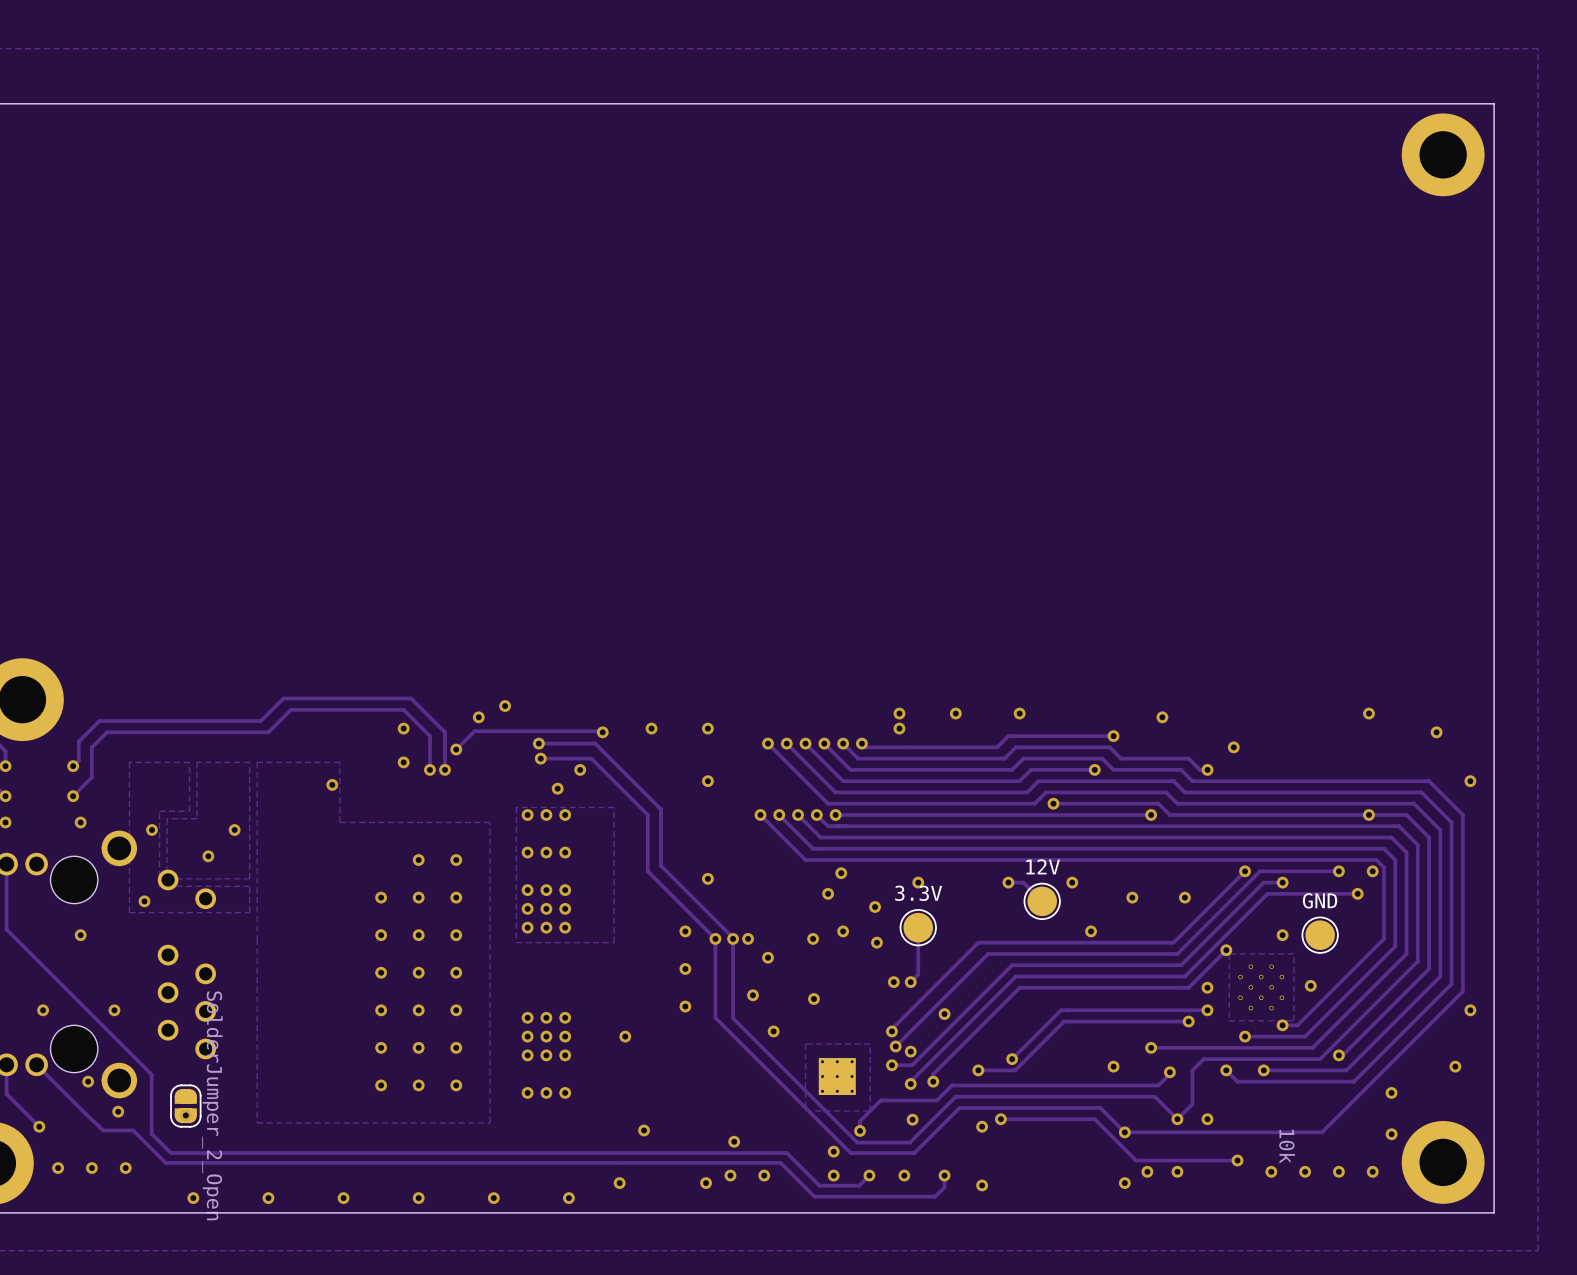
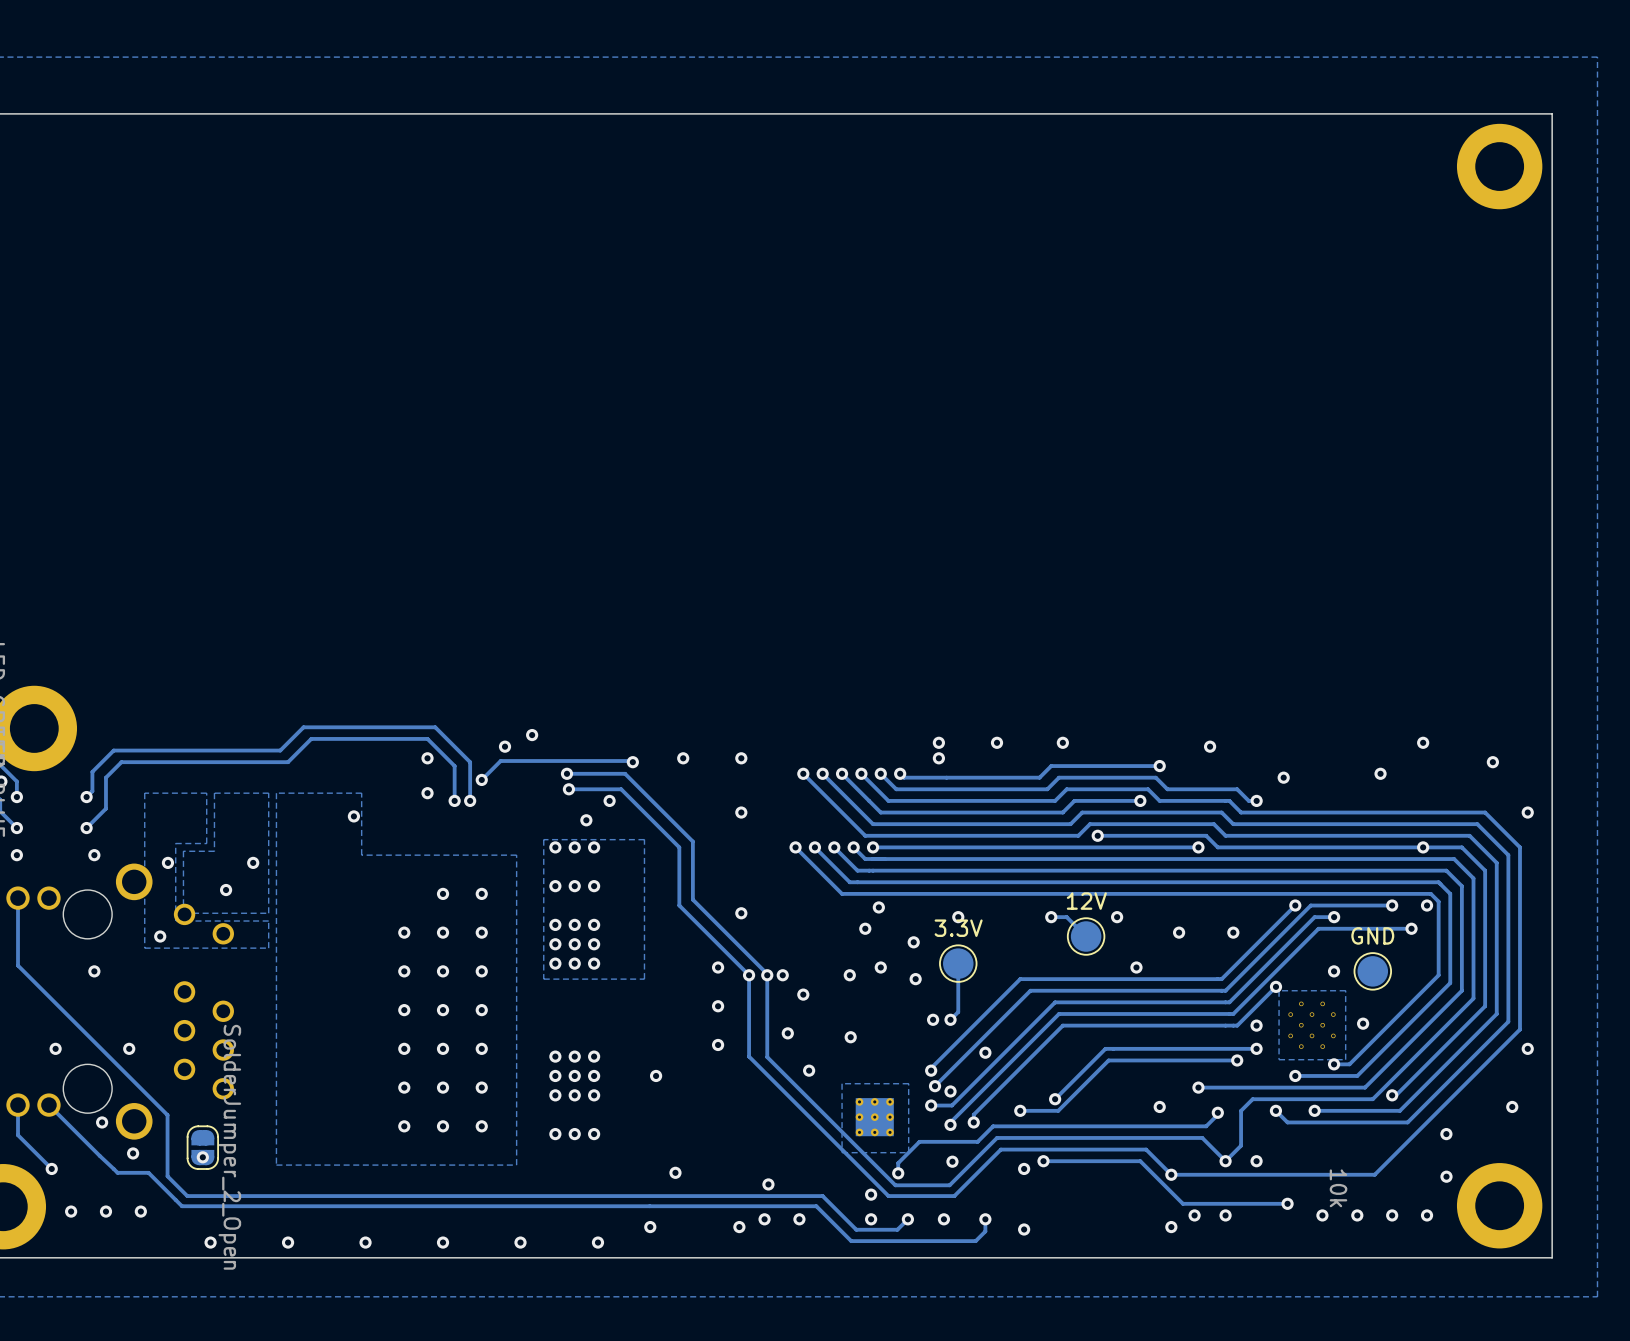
via: none -> (1380, 773)

